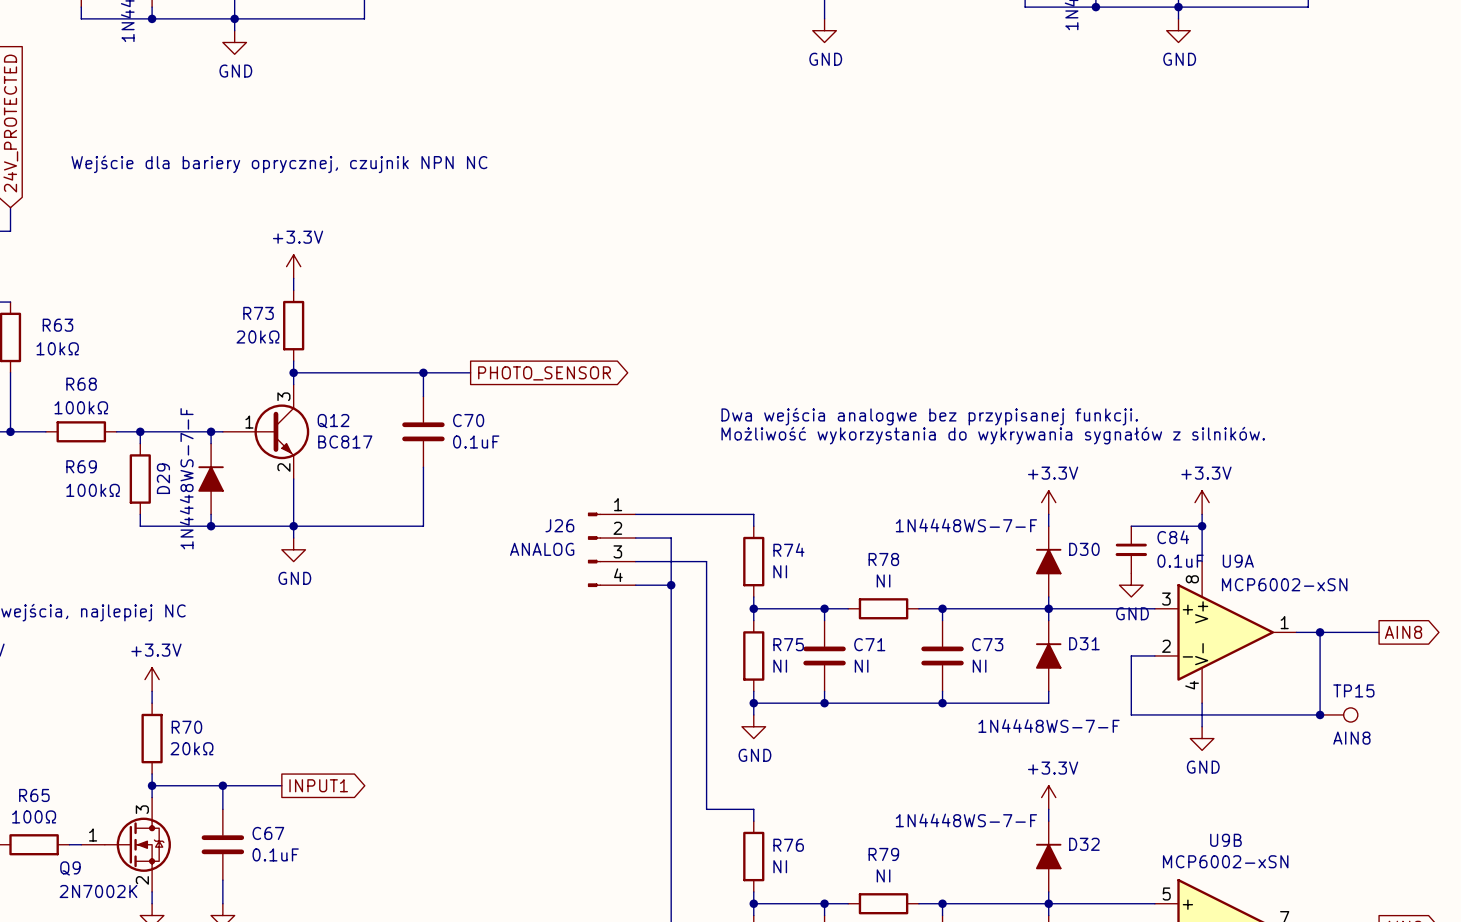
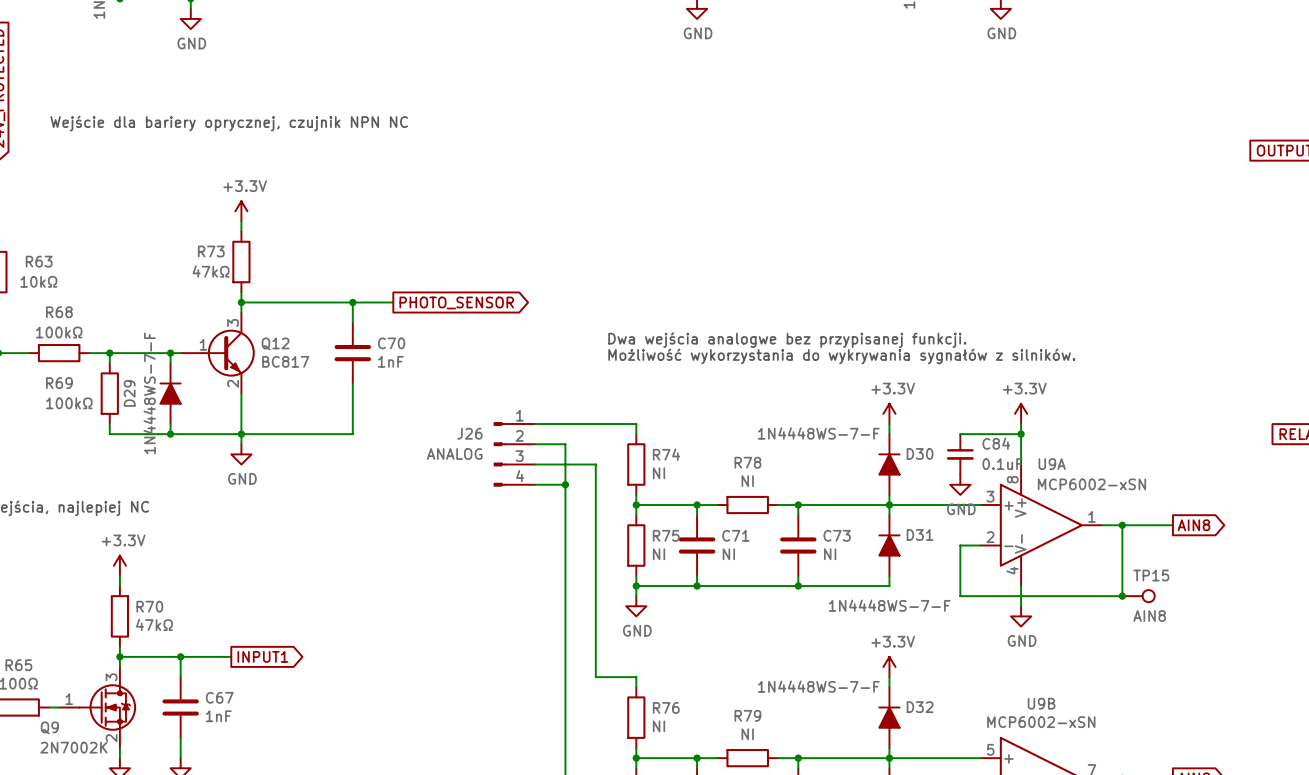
R73 value: 20kΩ (257, 336) -> 47kΩ (211, 271)
C70 value: 0.1uF (476, 442) -> 1nF (390, 361)
R70 value: 20kΩ (192, 748) -> 47kΩ (154, 624)
C67 value: 0.1uF (275, 854) -> 1nF (218, 716)

